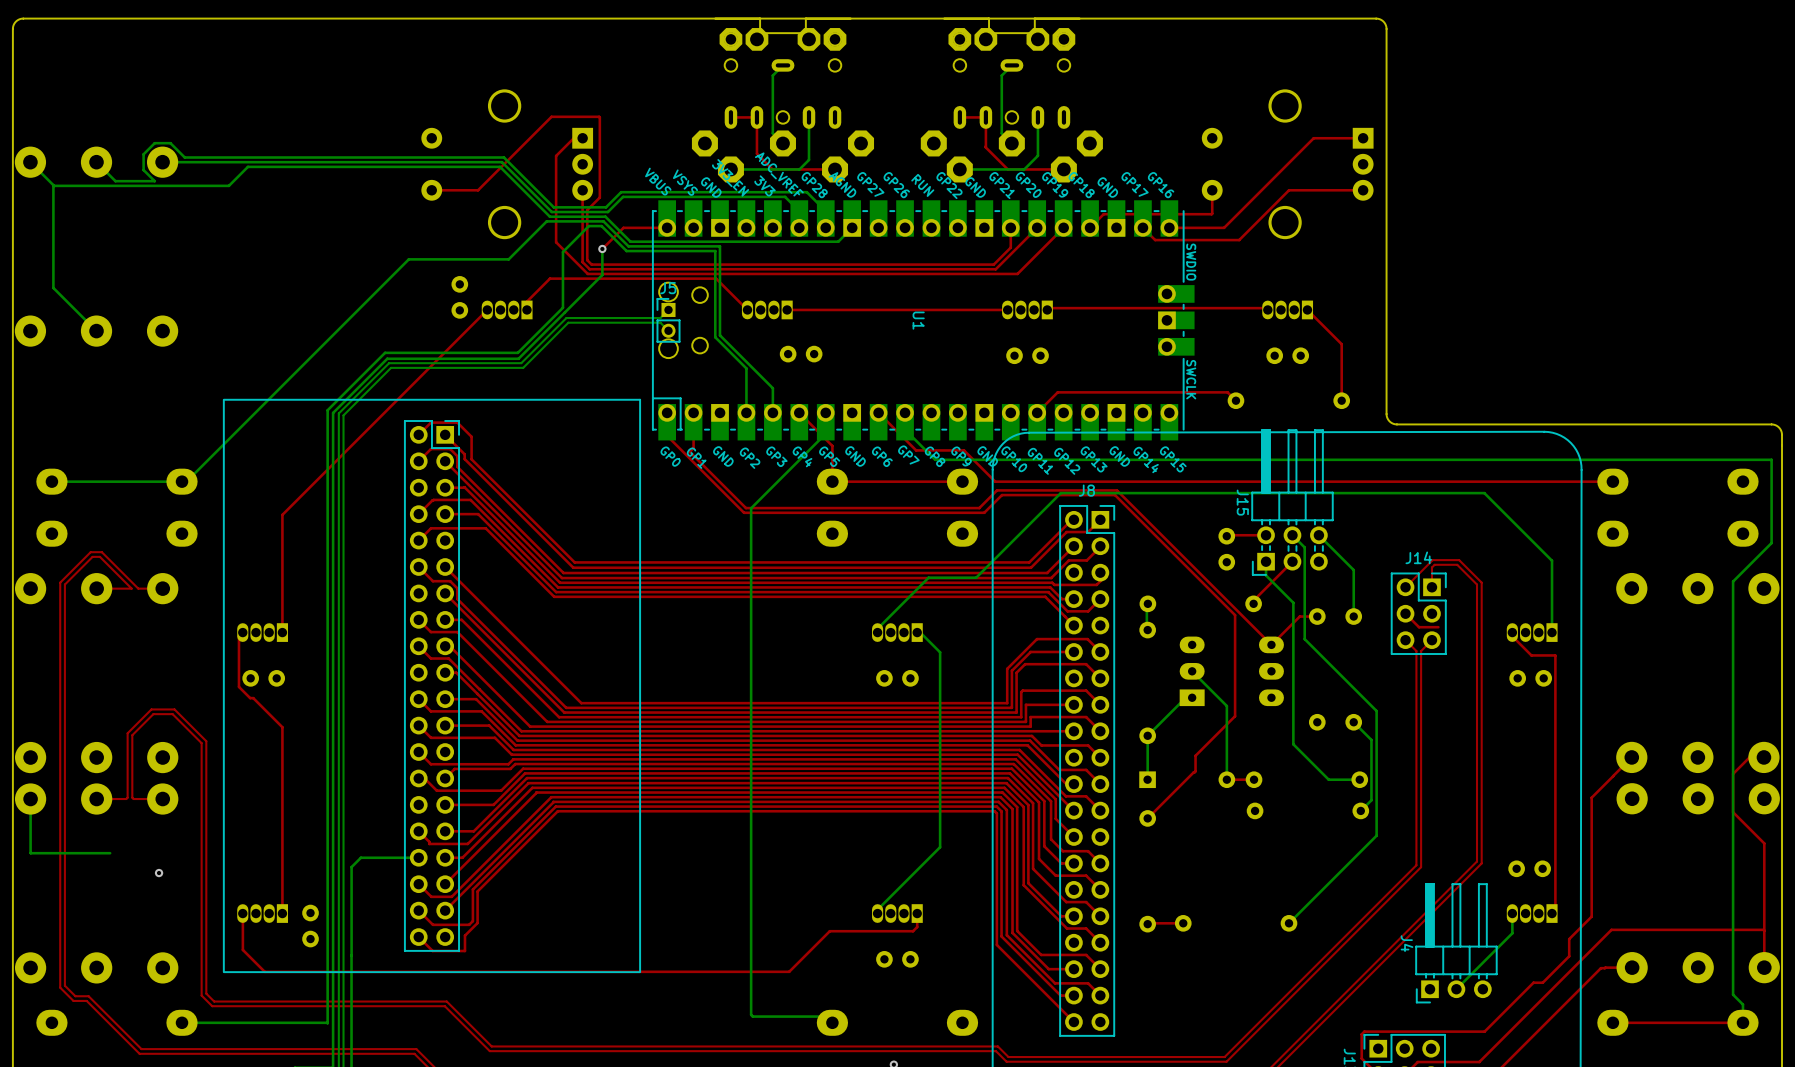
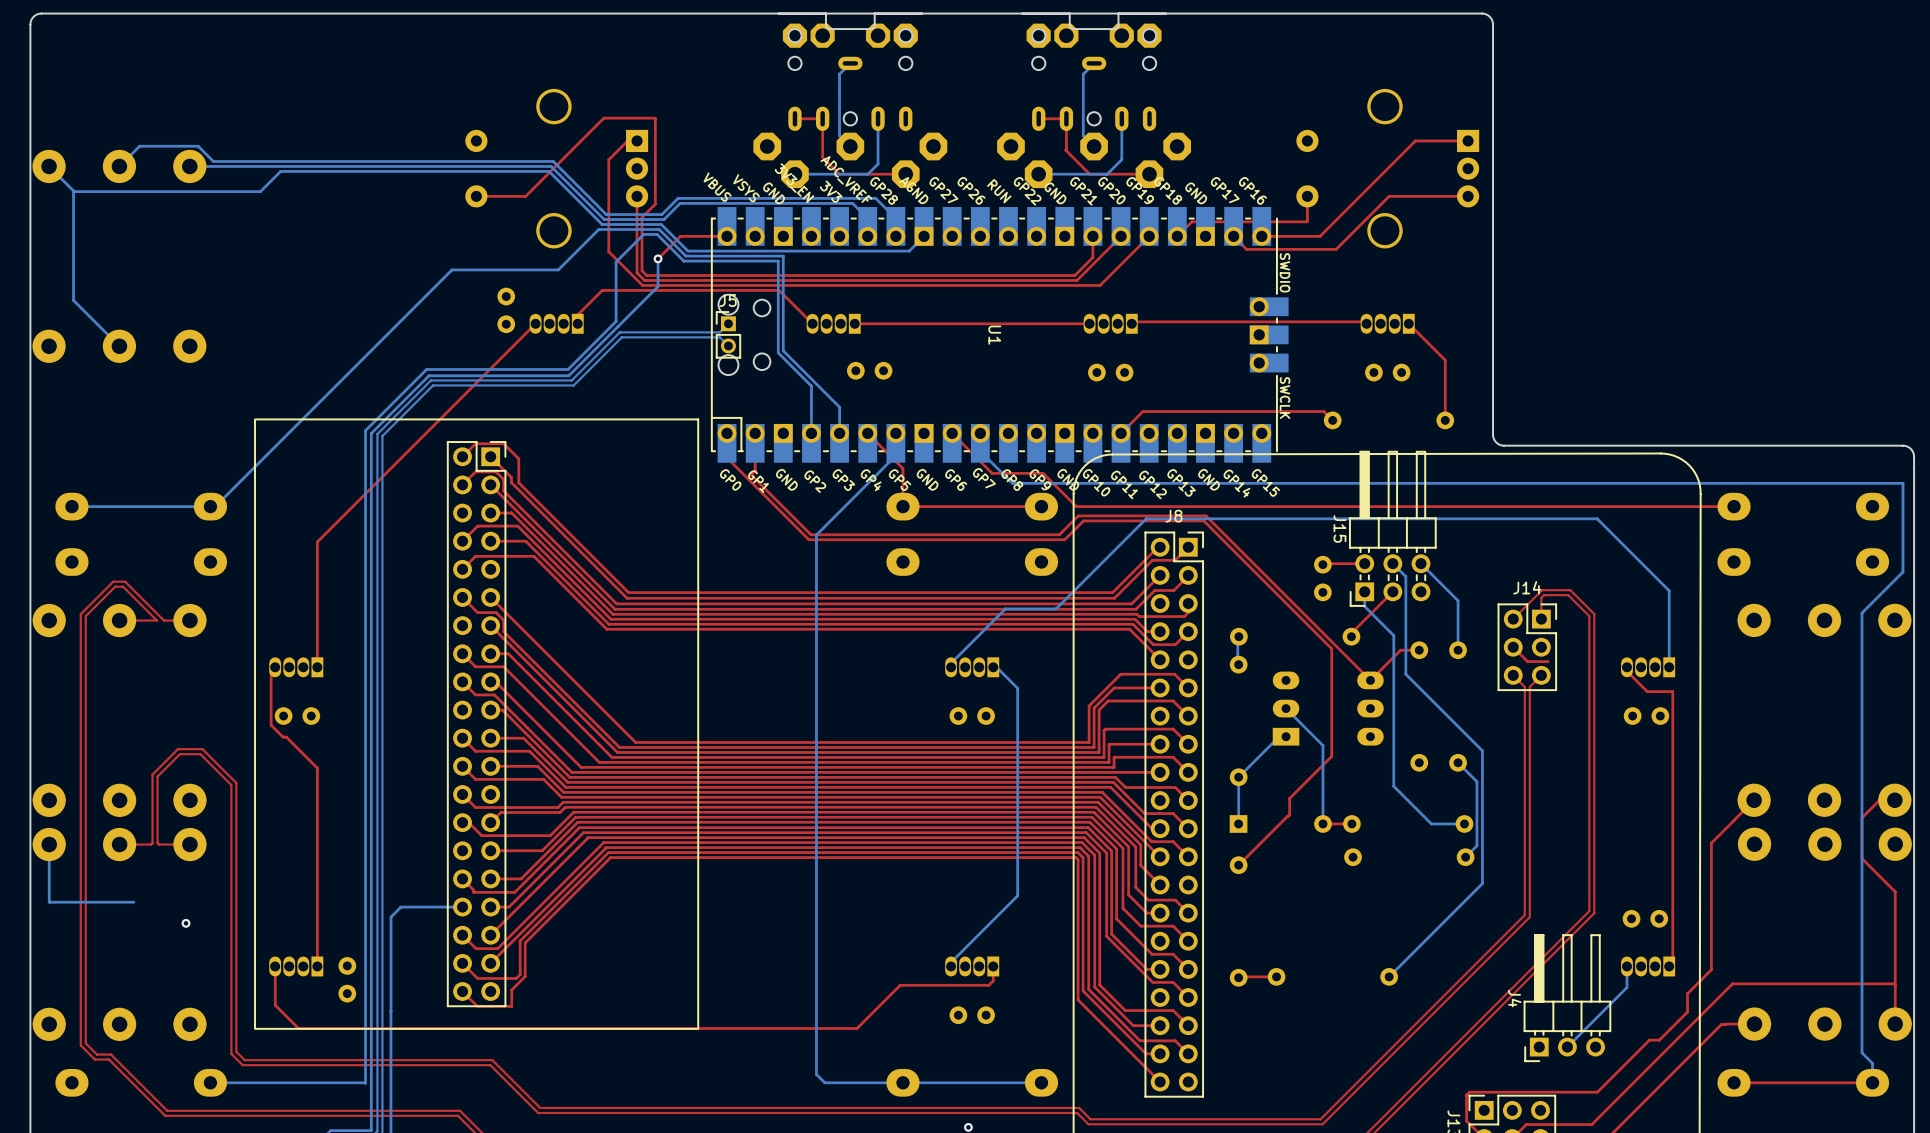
bottom track: (154, 143) (143, 154) (143, 170) (154, 181) (115, 181) (96, 162) -> (181, 146) (139, 146) (119, 166)
bottom track: (752, 1016) (826, 1016) (832, 1022) -> (818, 1076) (824, 1082) (1041, 1082)

